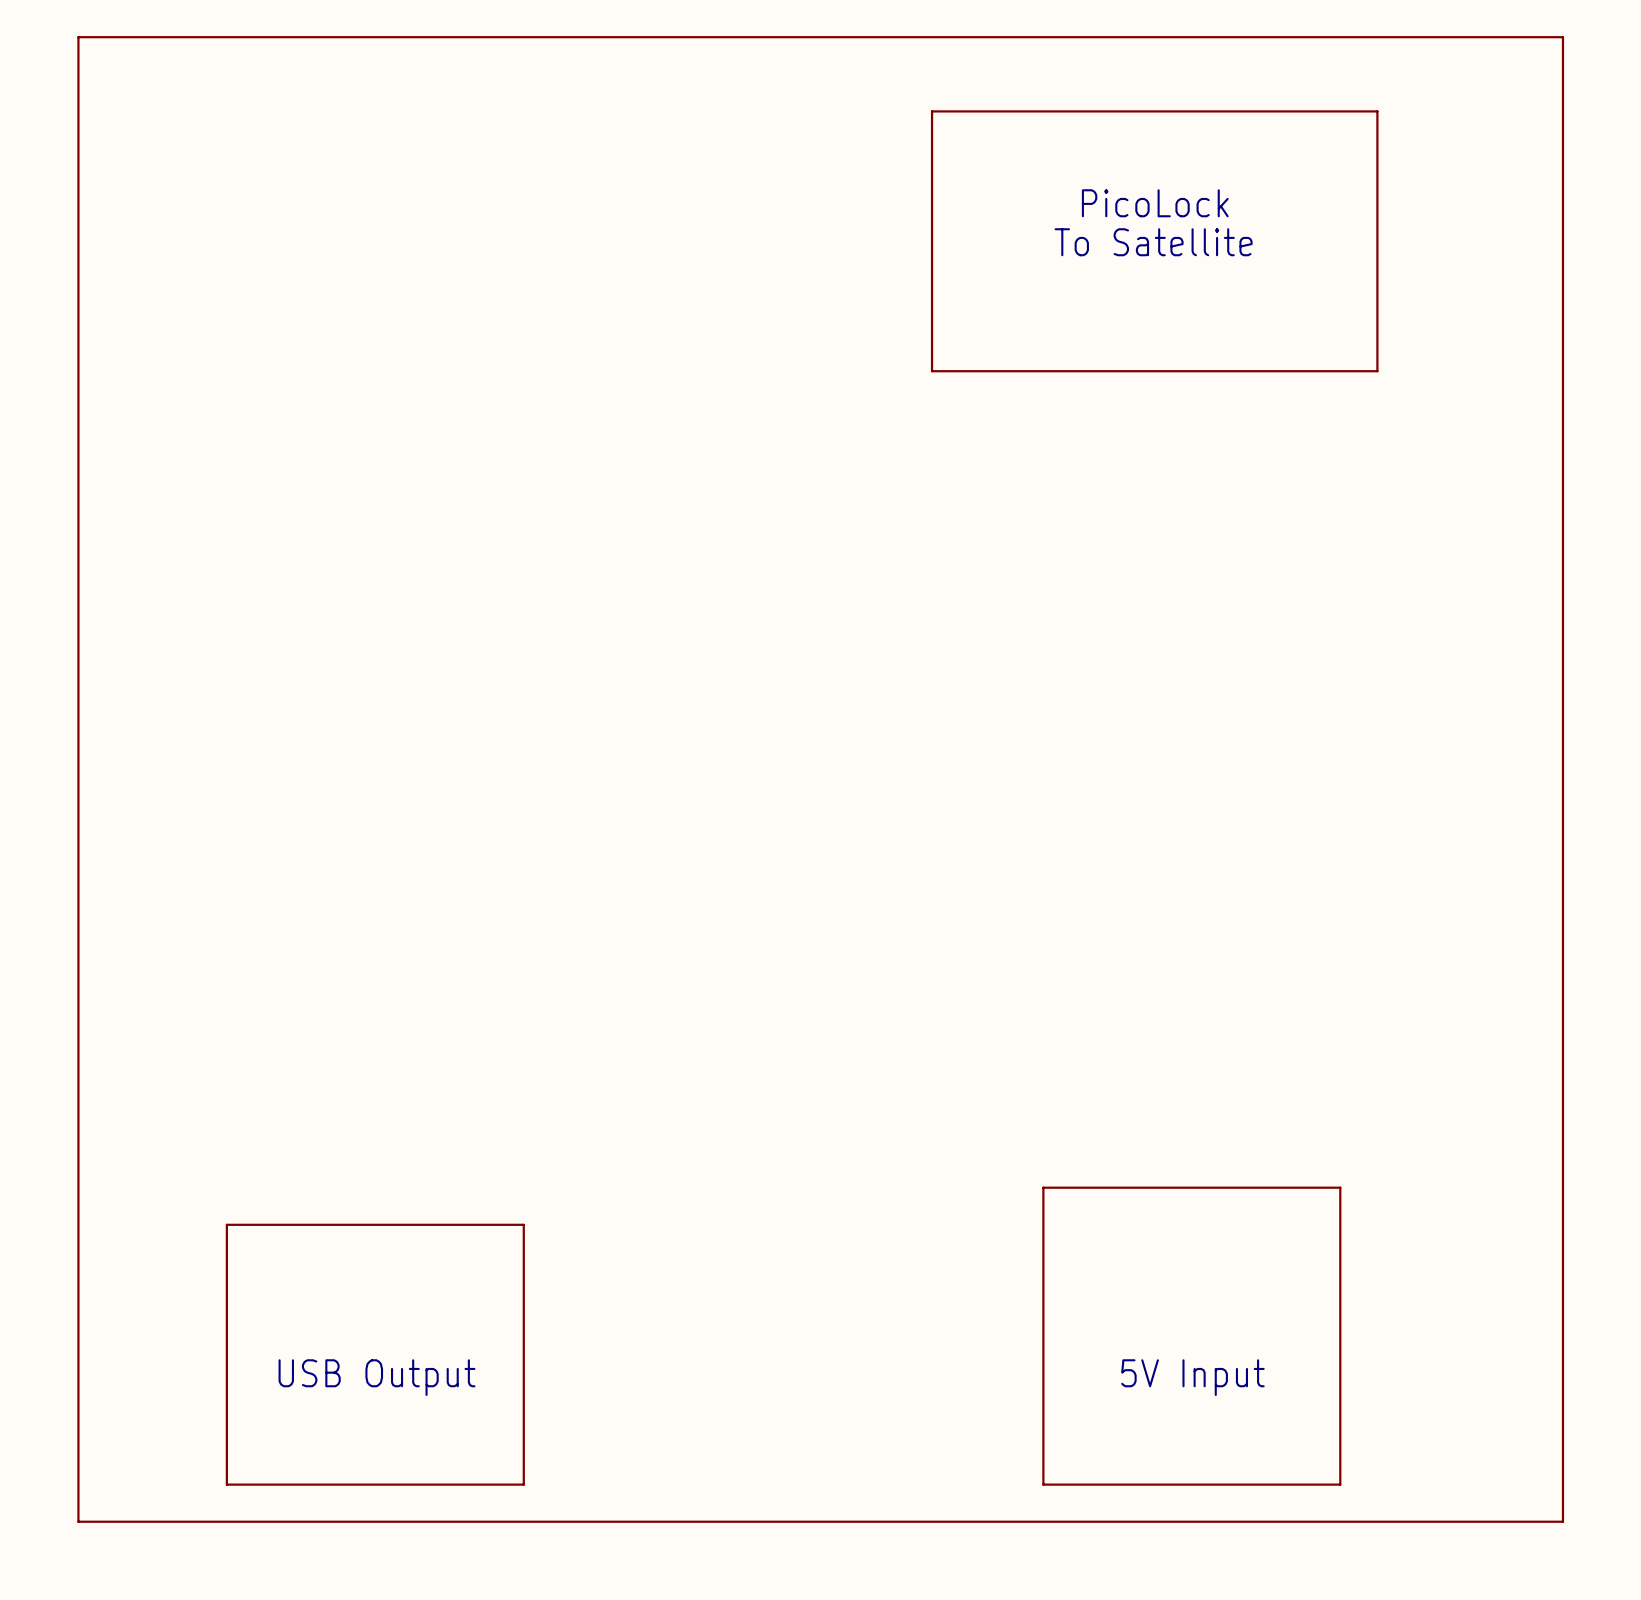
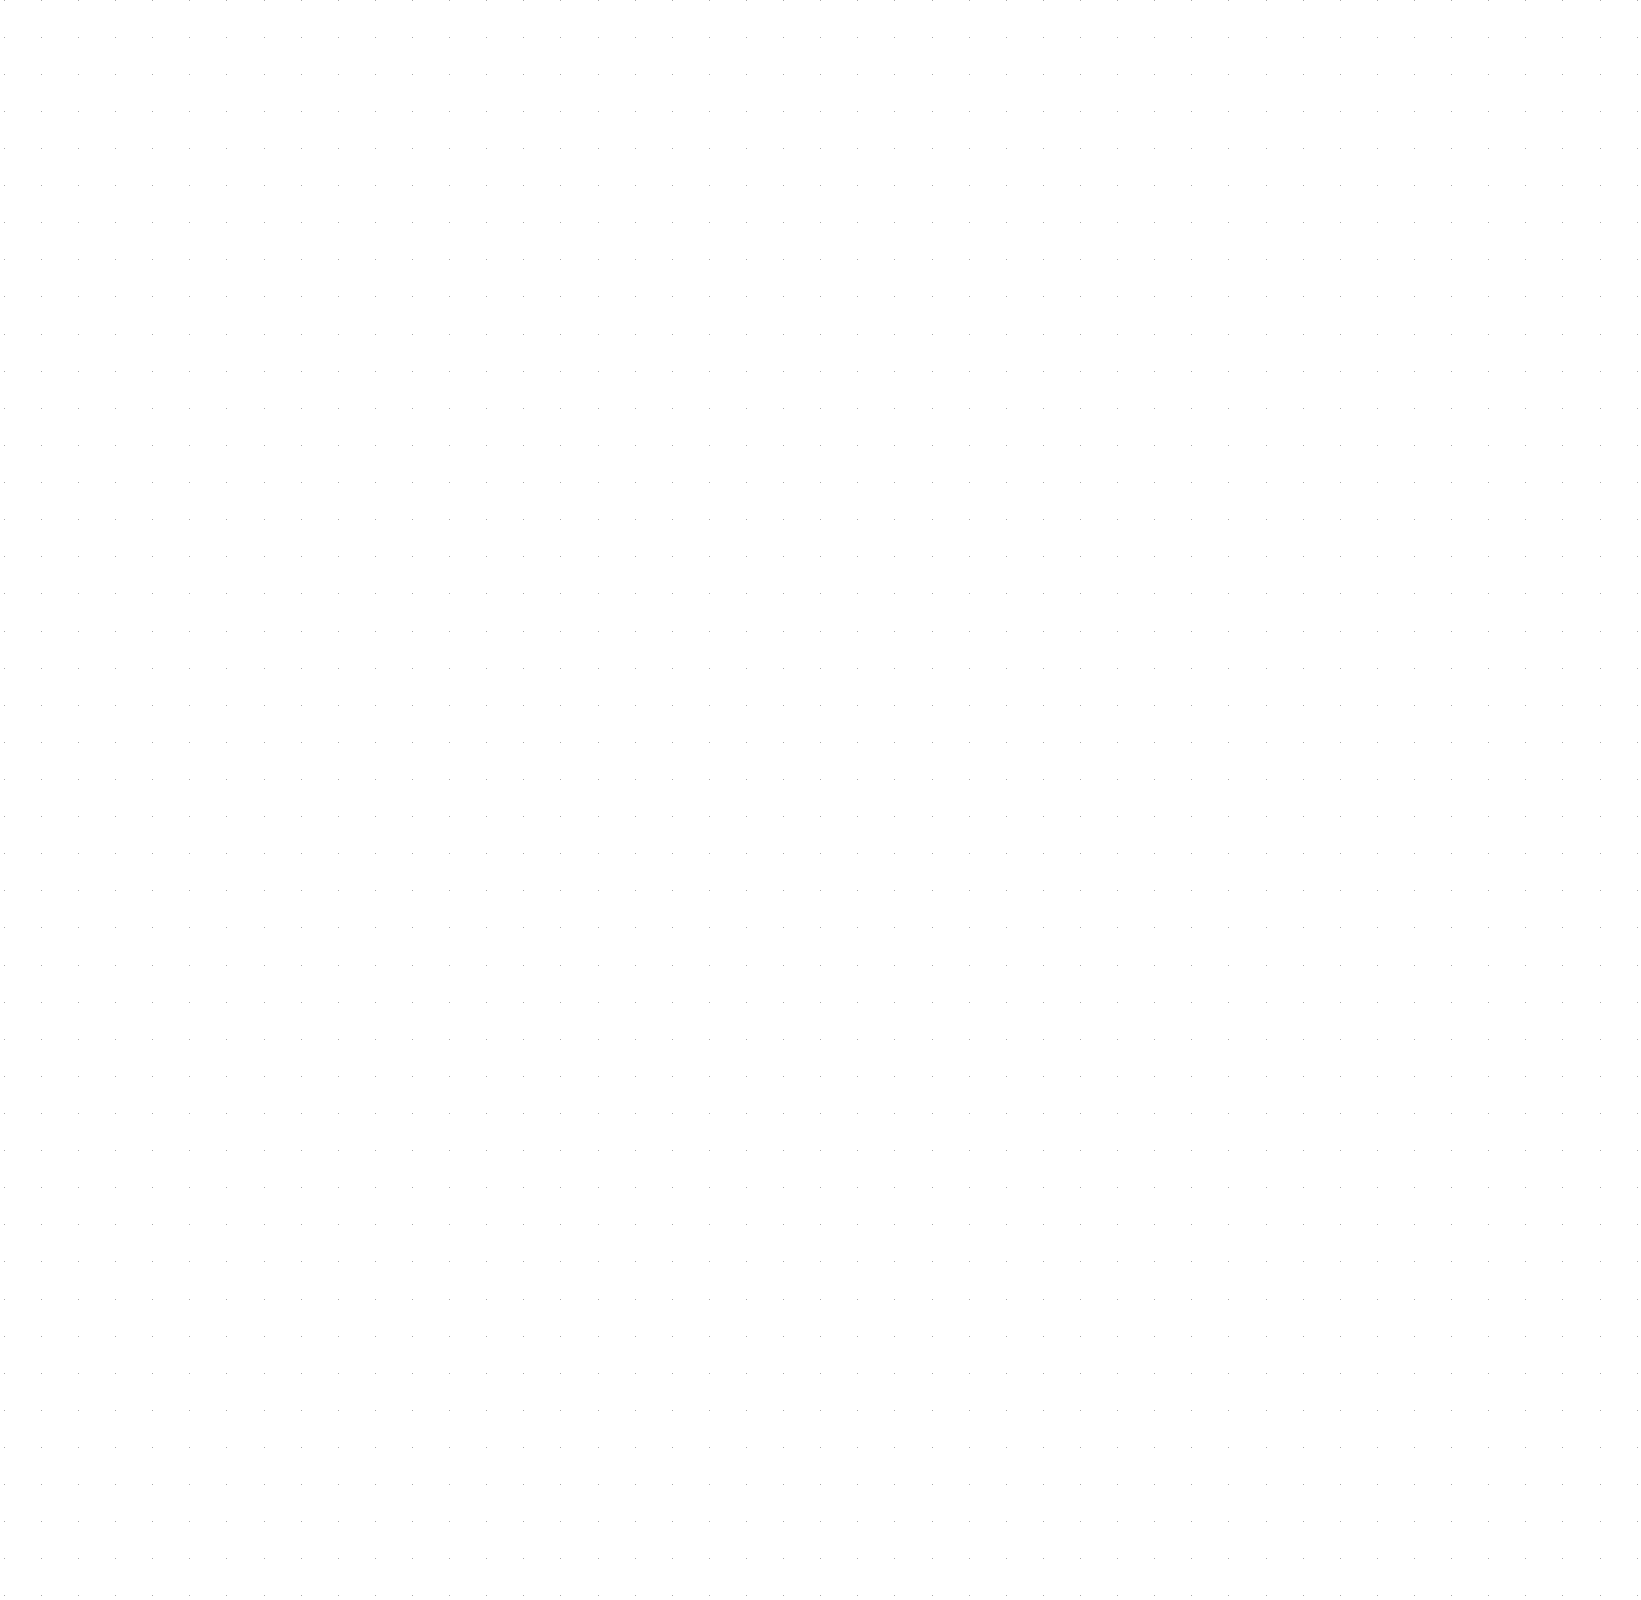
line: (78, 37) (78, 1521) (1562, 1521) (1562, 37) (78, 37) -> none
line: (932, 111) (932, 371) (1377, 371) (1377, 111) (932, 111) -> none
text: PicoLock (1155, 203) -> none
text: To Satellite (1153, 242) -> none
line: (1043, 1187) (1340, 1187) (1340, 1484) (1043, 1484) (1043, 1187) -> none
line: (226, 1224) (226, 1484) (523, 1484) (523, 1224) (226, 1224) -> none
text: USB Output (377, 1377) -> none
text: 5V Input (1192, 1377) -> none

